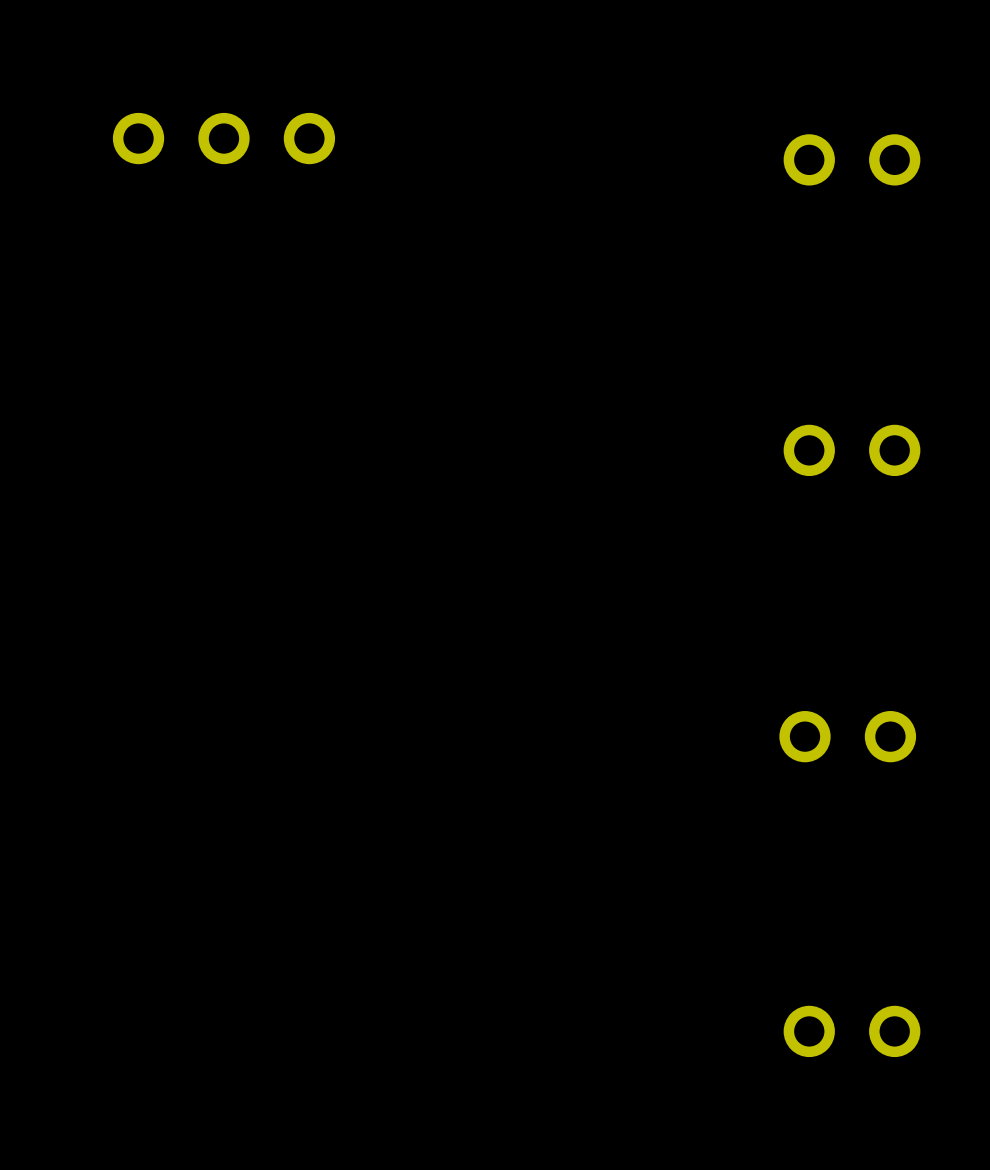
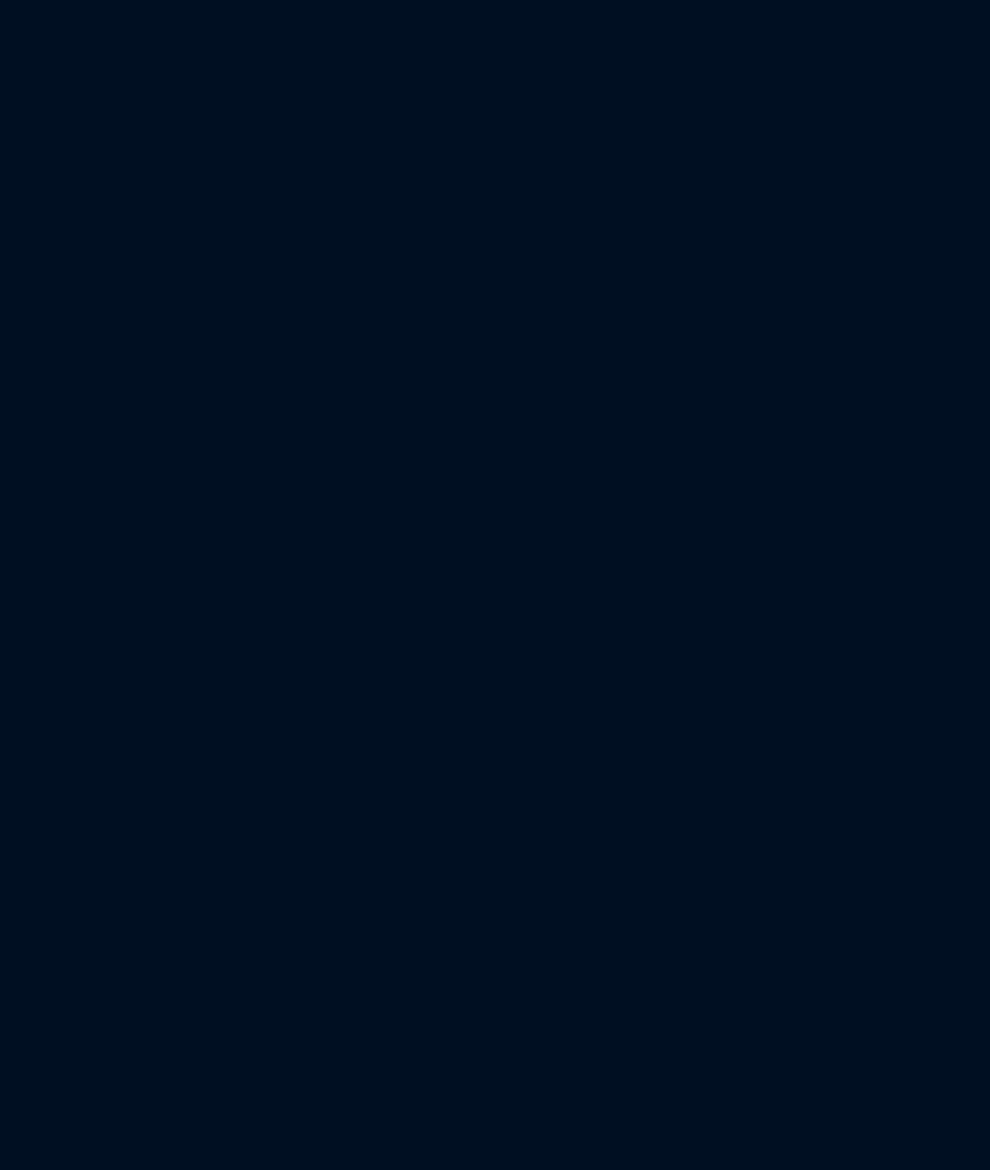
part: (223, 138) -> none
part: (851, 159) -> none
part: (851, 450) -> none
part: (847, 736) -> none
part: (851, 1031) -> none

